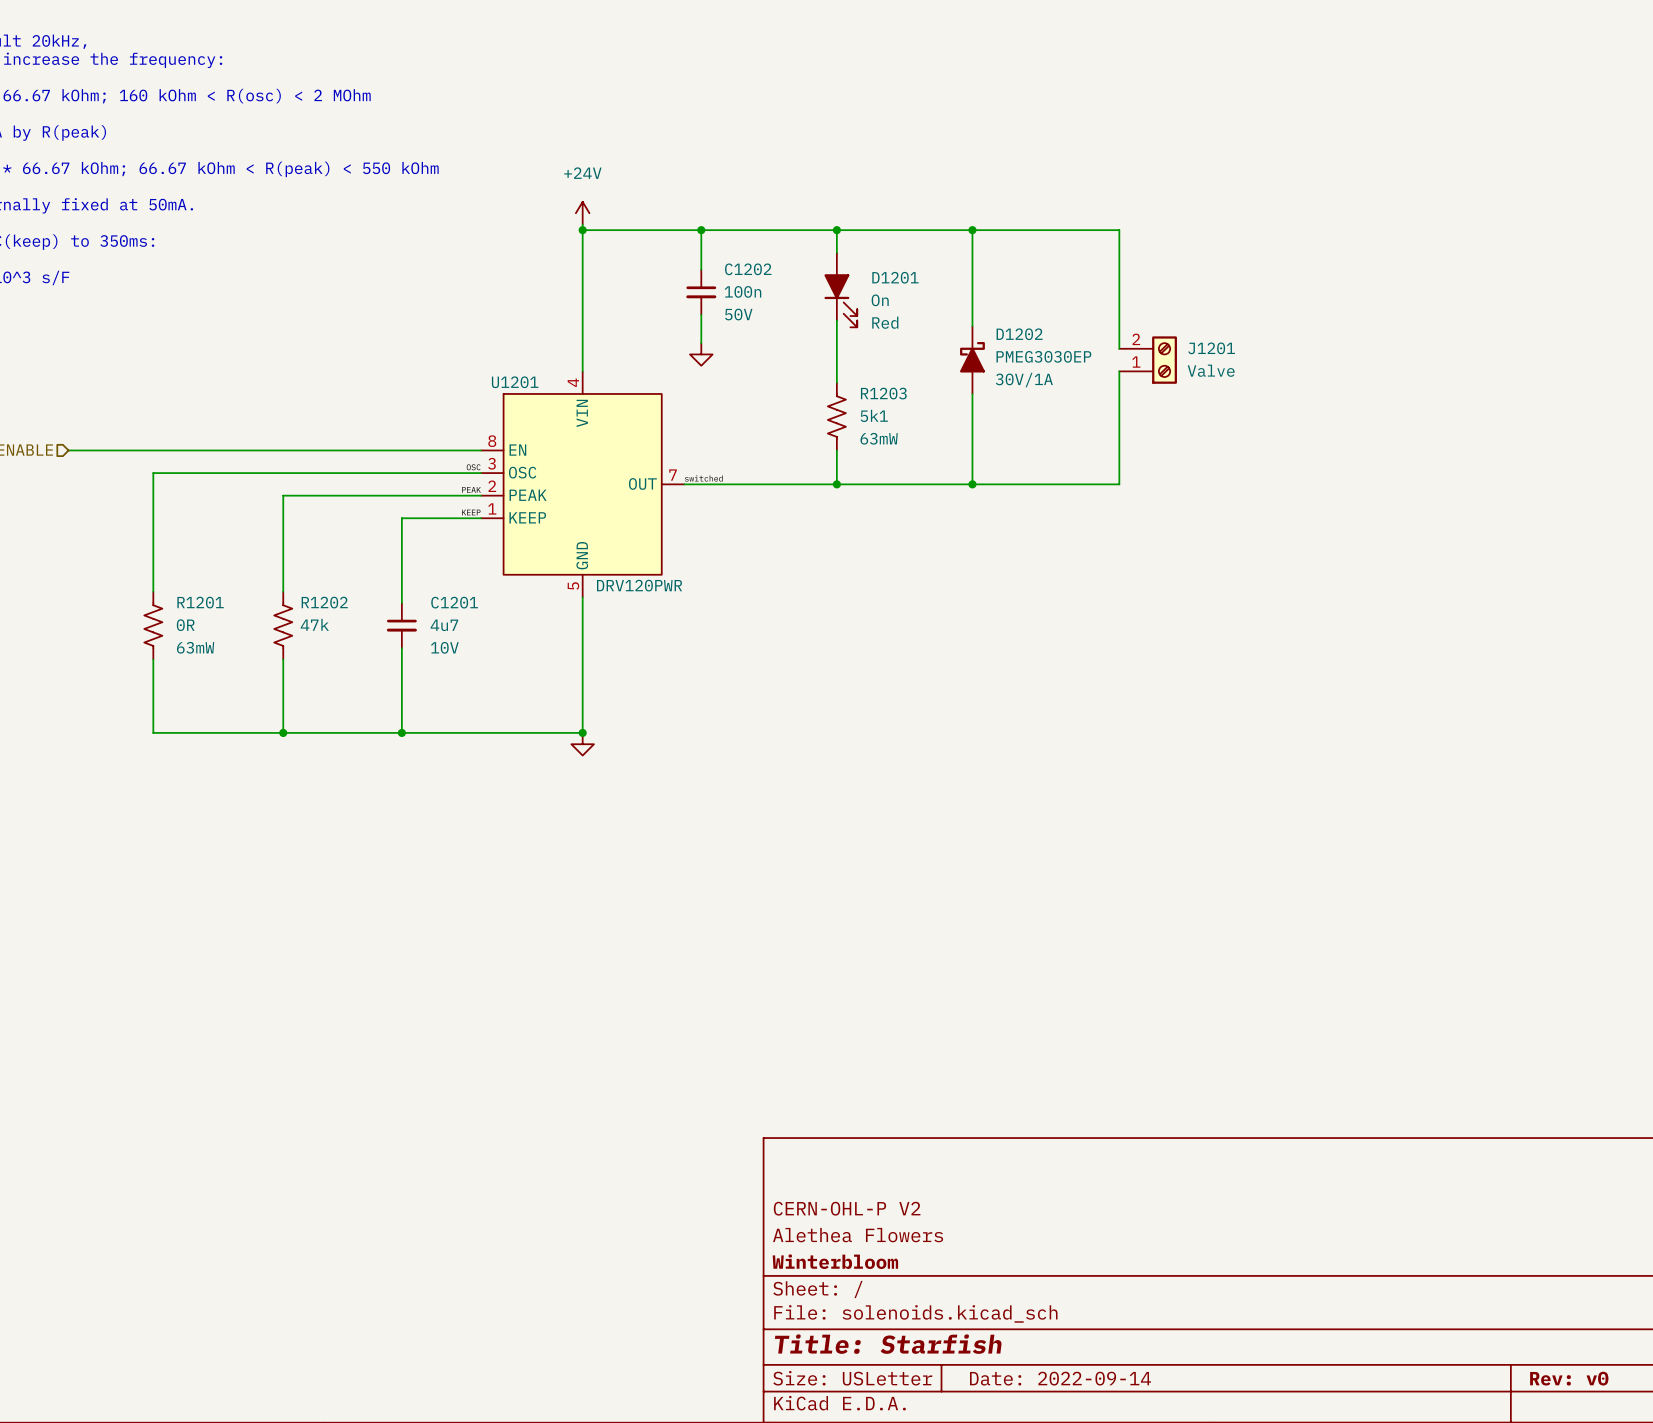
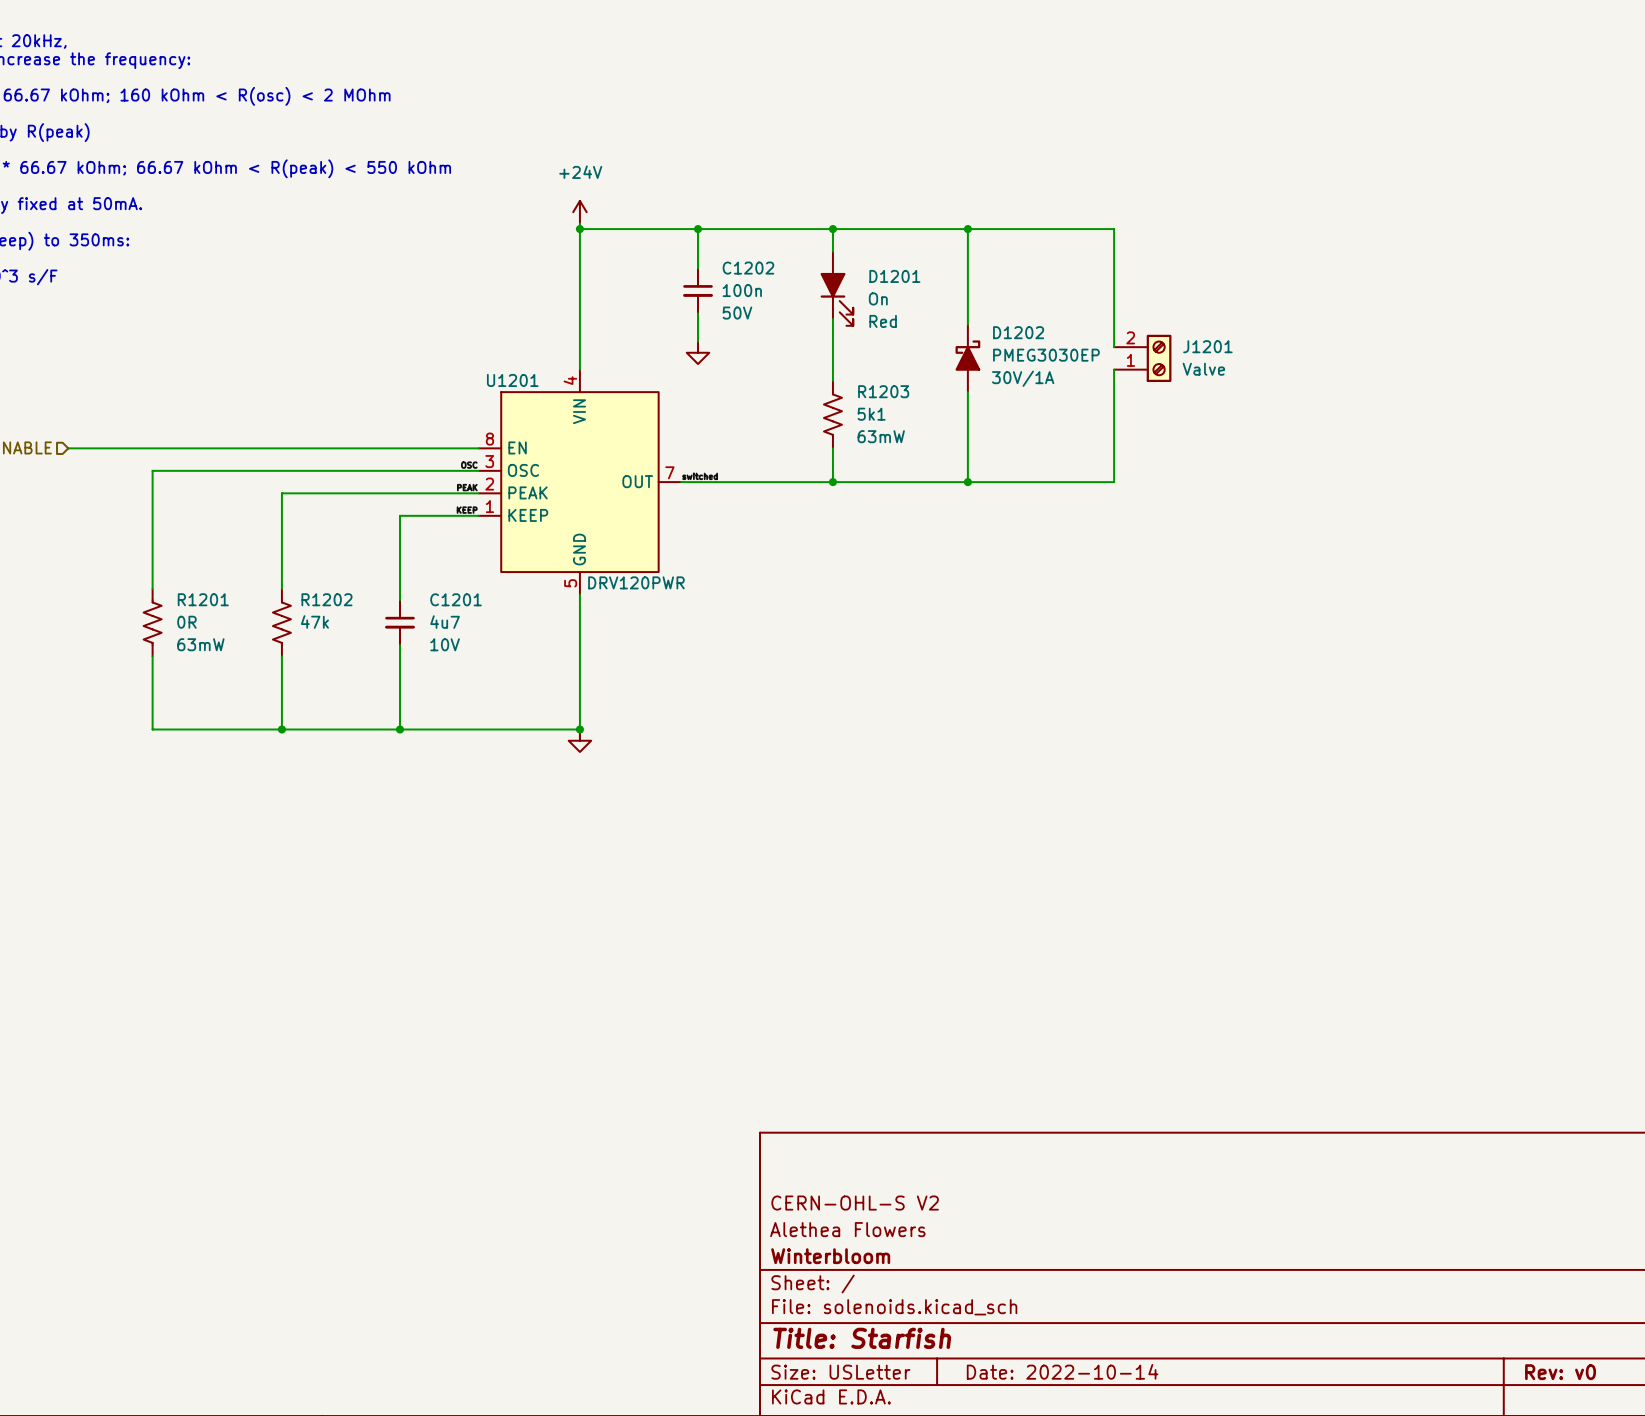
title block: CERN-OHL-P V2 (847, 1208) -> CERN-OHL-S V2 (855, 1203)
title block: Date: 2022-09-14 (1060, 1378) -> Date: 2022-10-14 (1062, 1371)

